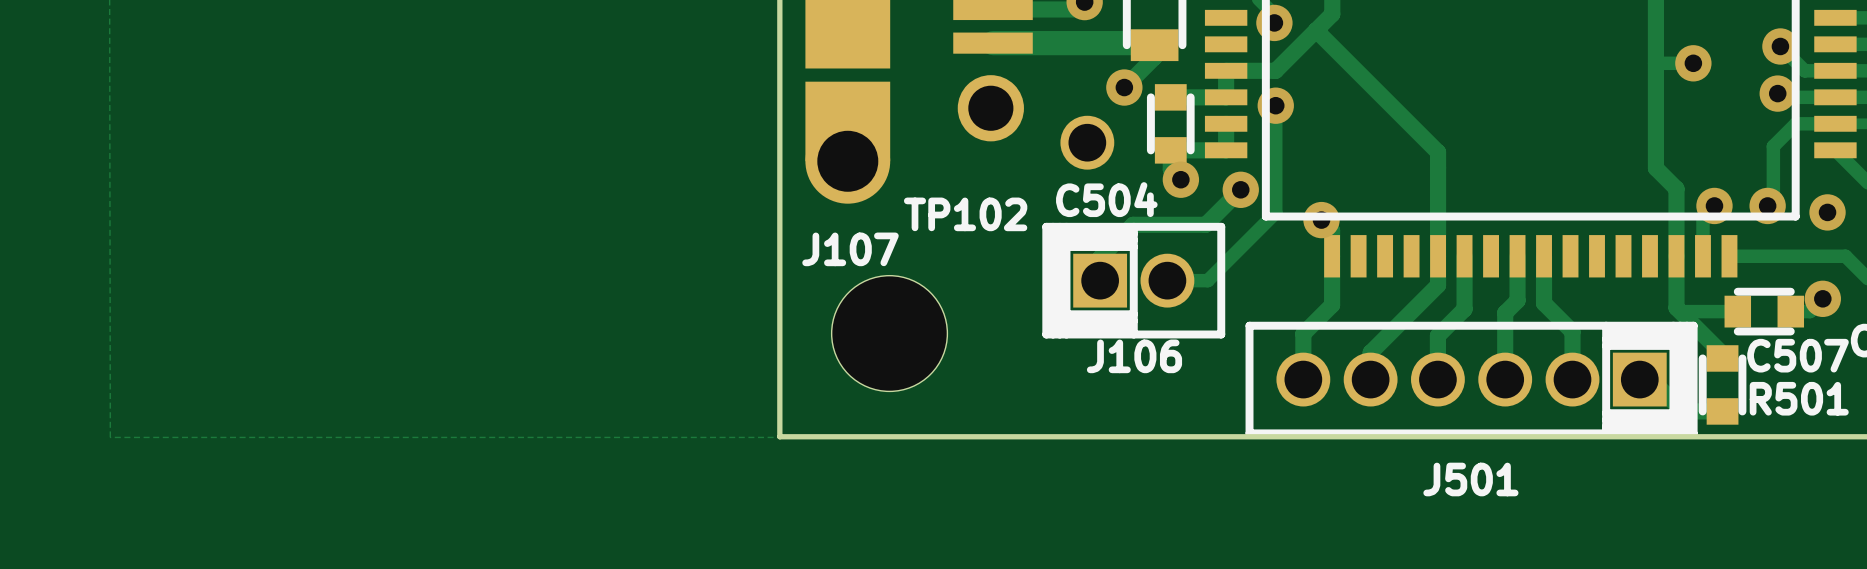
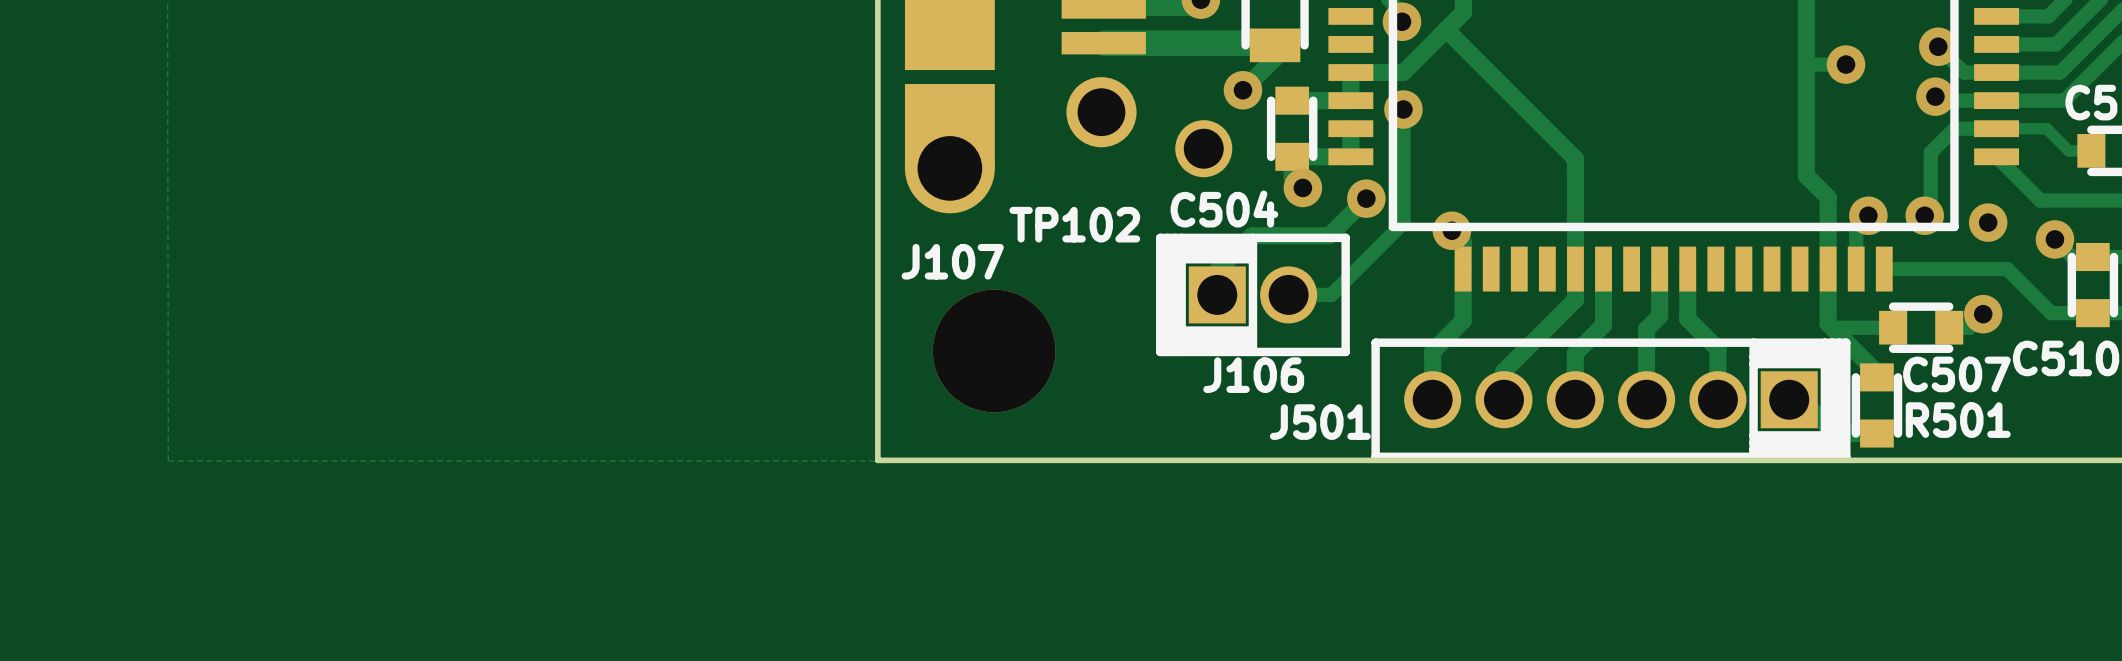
part footprint: [831, 275, 948, 392] -> [932, 289, 1056, 413]
J501 name position: J501 (1470, 479) -> J501 (1320, 422)

